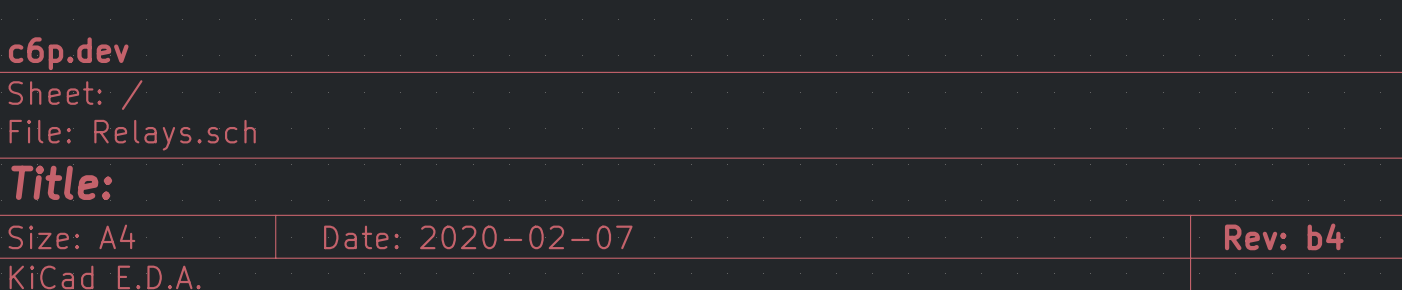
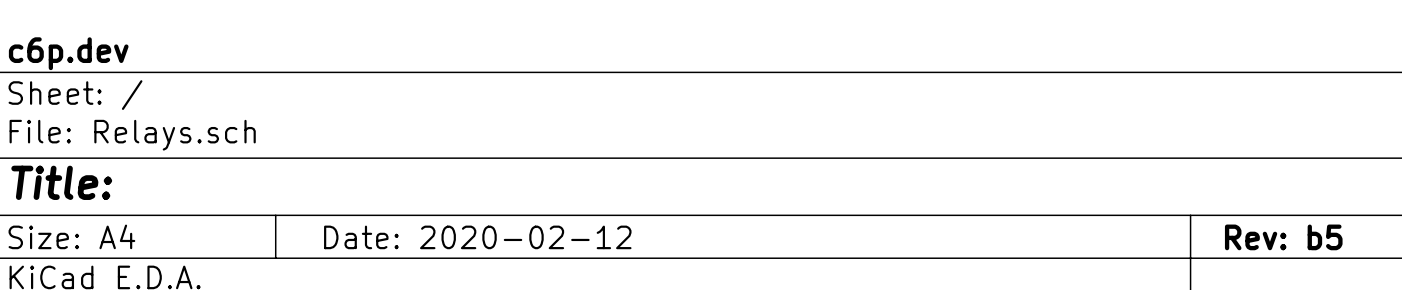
title block: Rev: b4 (1284, 236) -> Rev: b5 (1283, 237)
title block: Date: 2020-02-07 (478, 237) -> Date: 2020-02-12 (477, 237)

